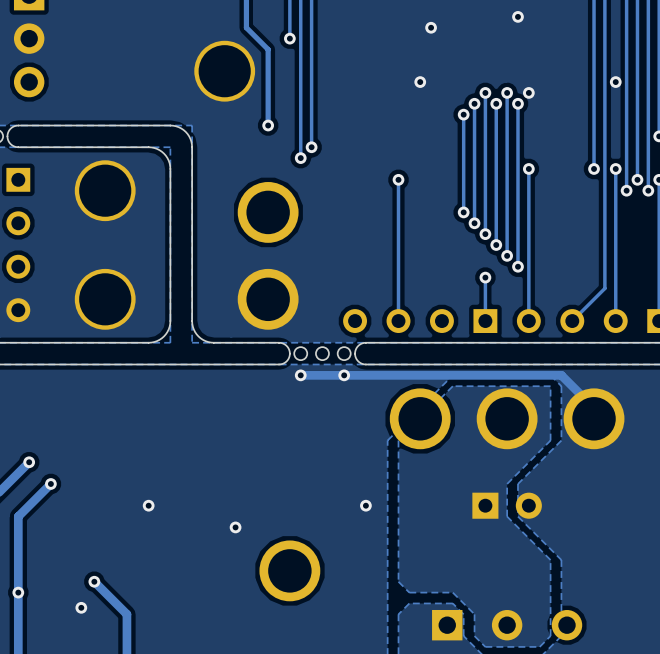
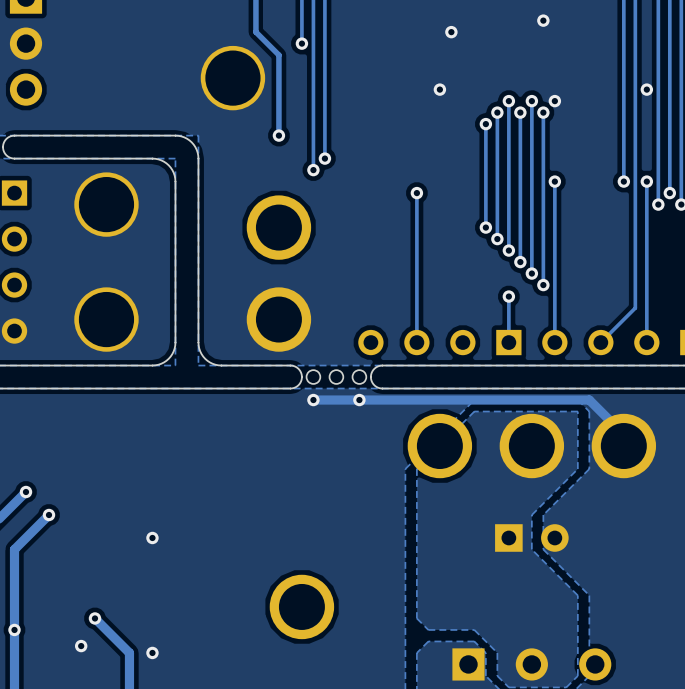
via: (365, 505) -> none
via: (235, 527) -> none
via: none -> (152, 652)

